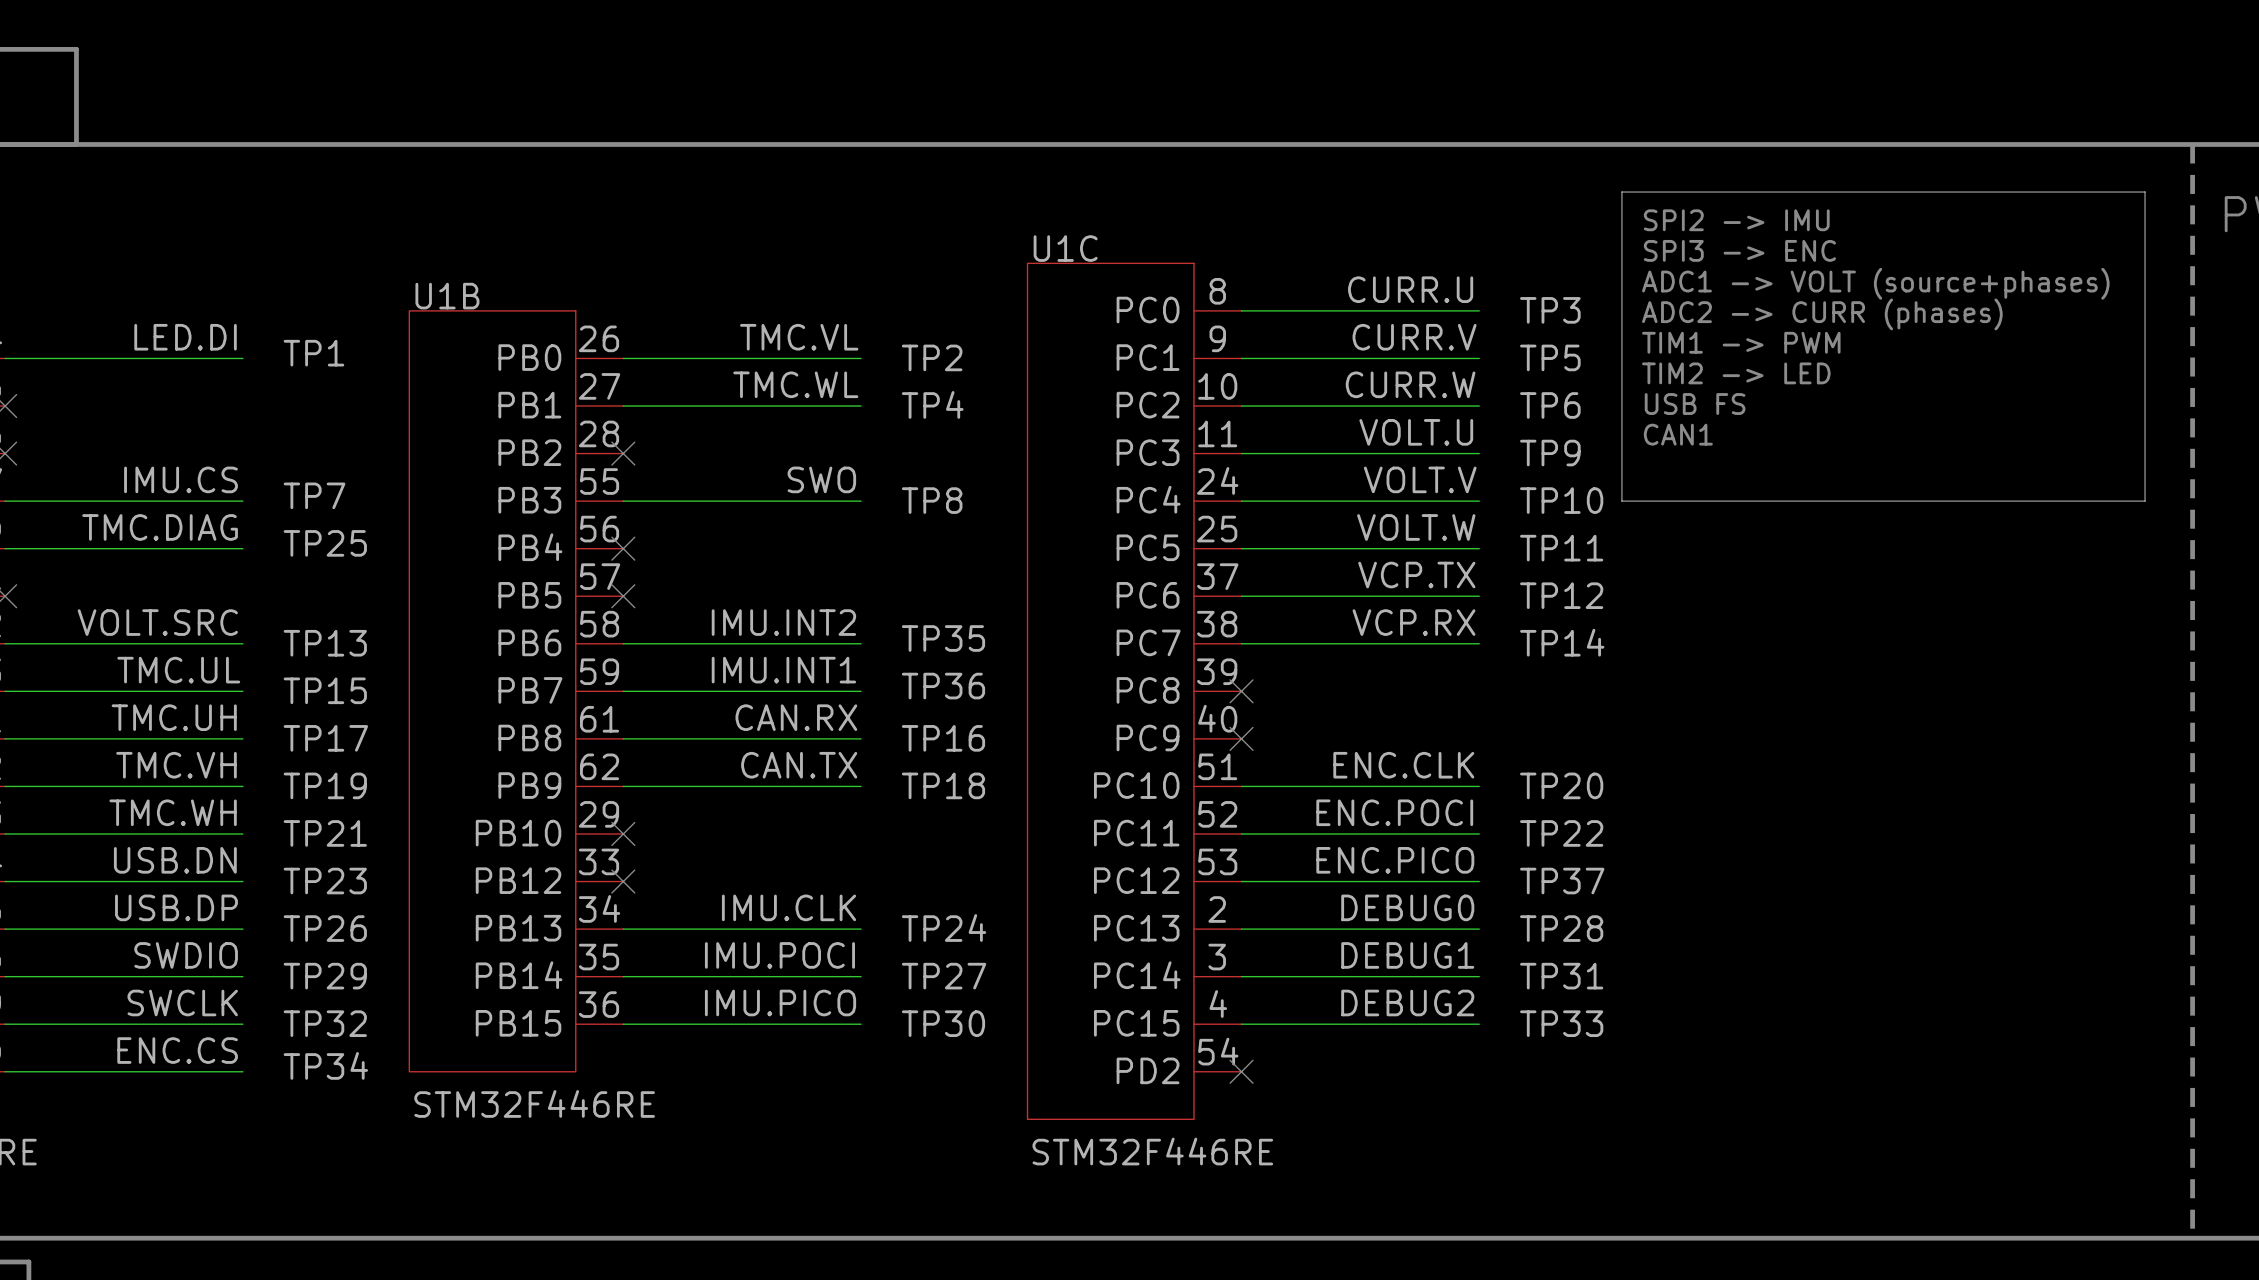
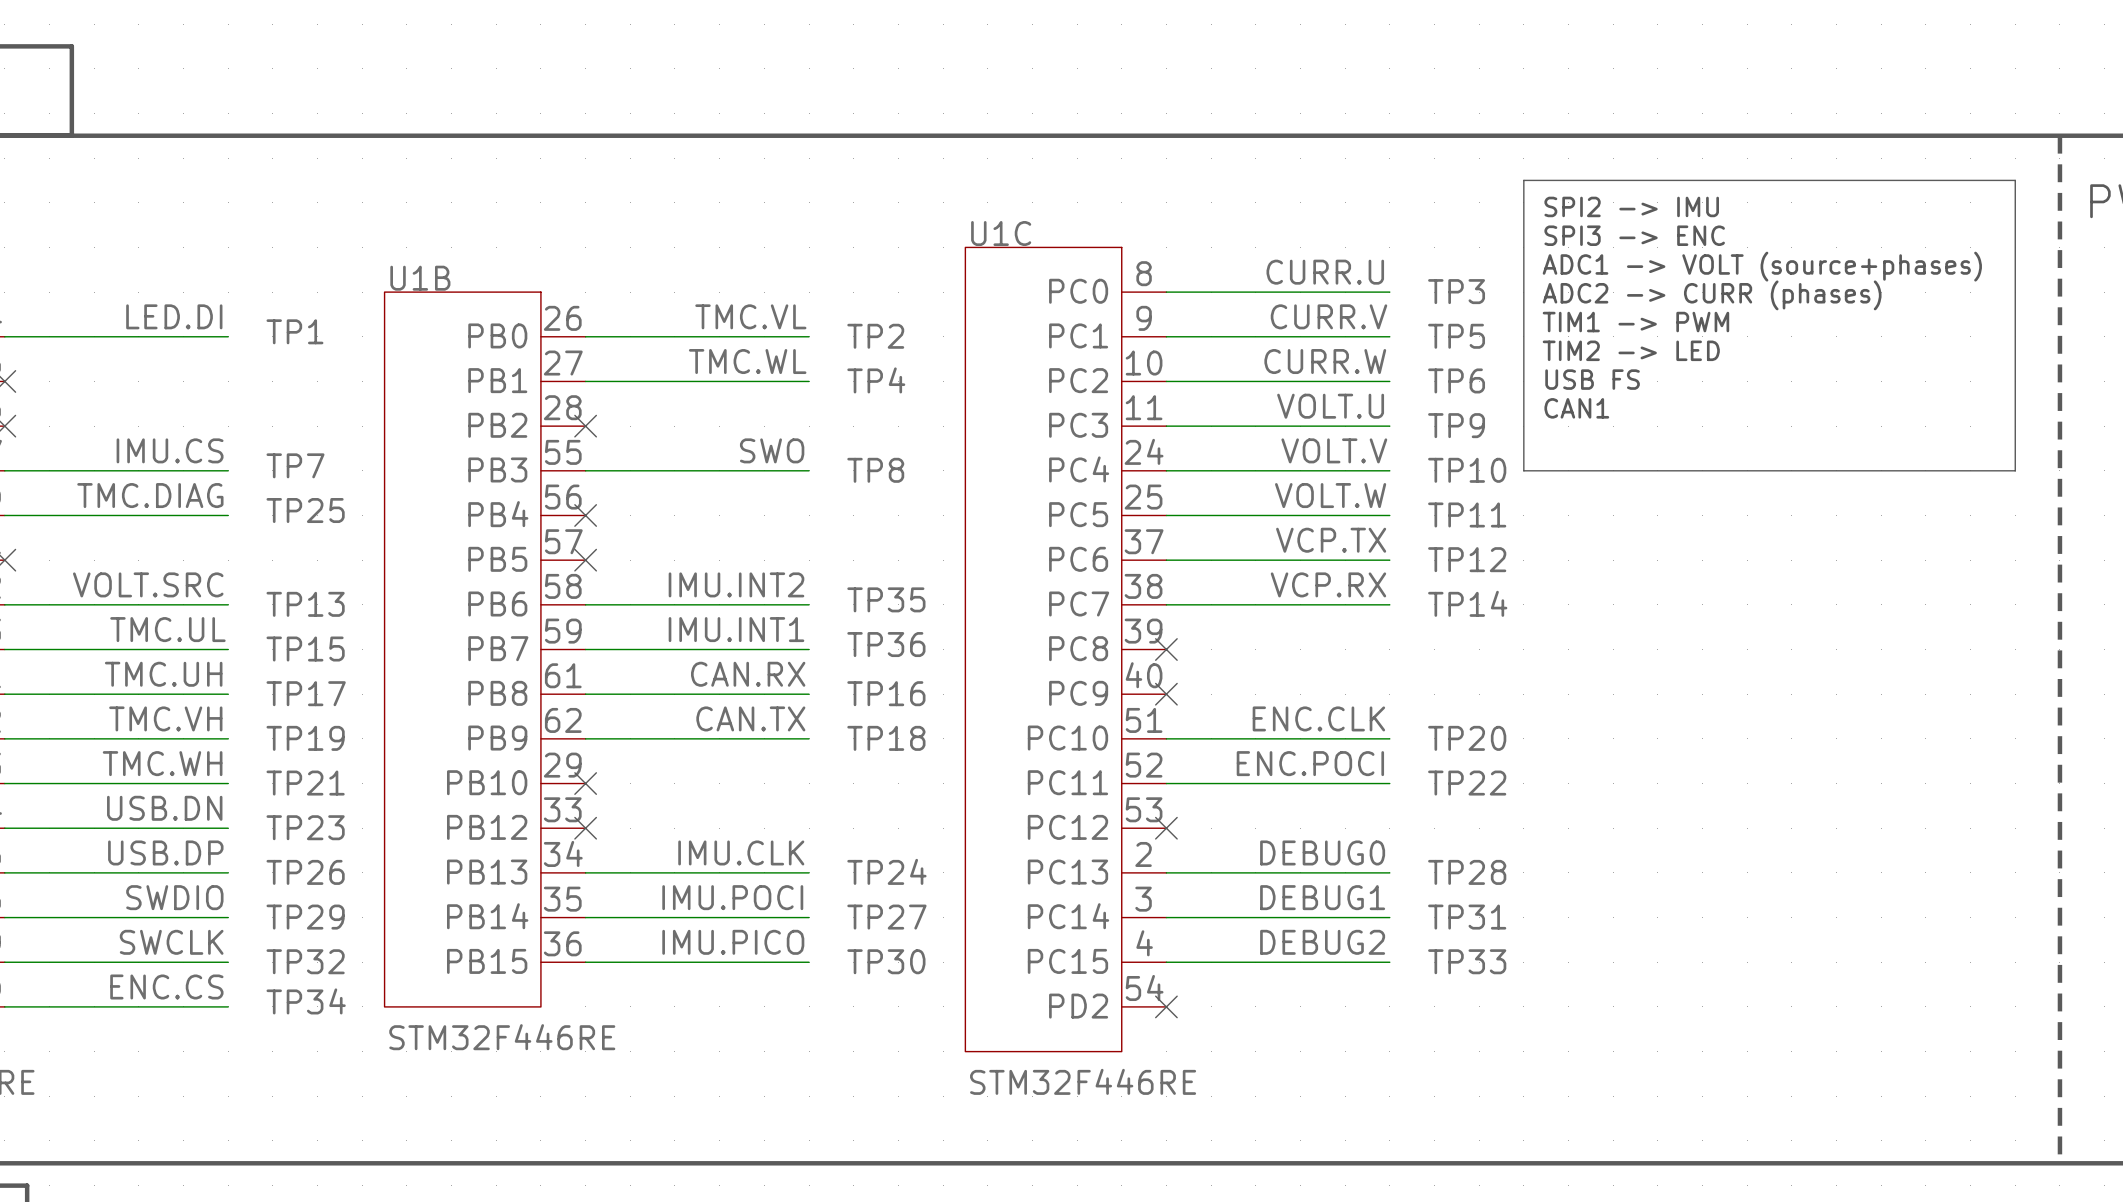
label: ENC.PICO (1395, 860) -> none
wire: (1241, 881) (1479, 881) -> none
no-connect mark: none -> (1166, 828)
TP37: (1562, 881) -> none

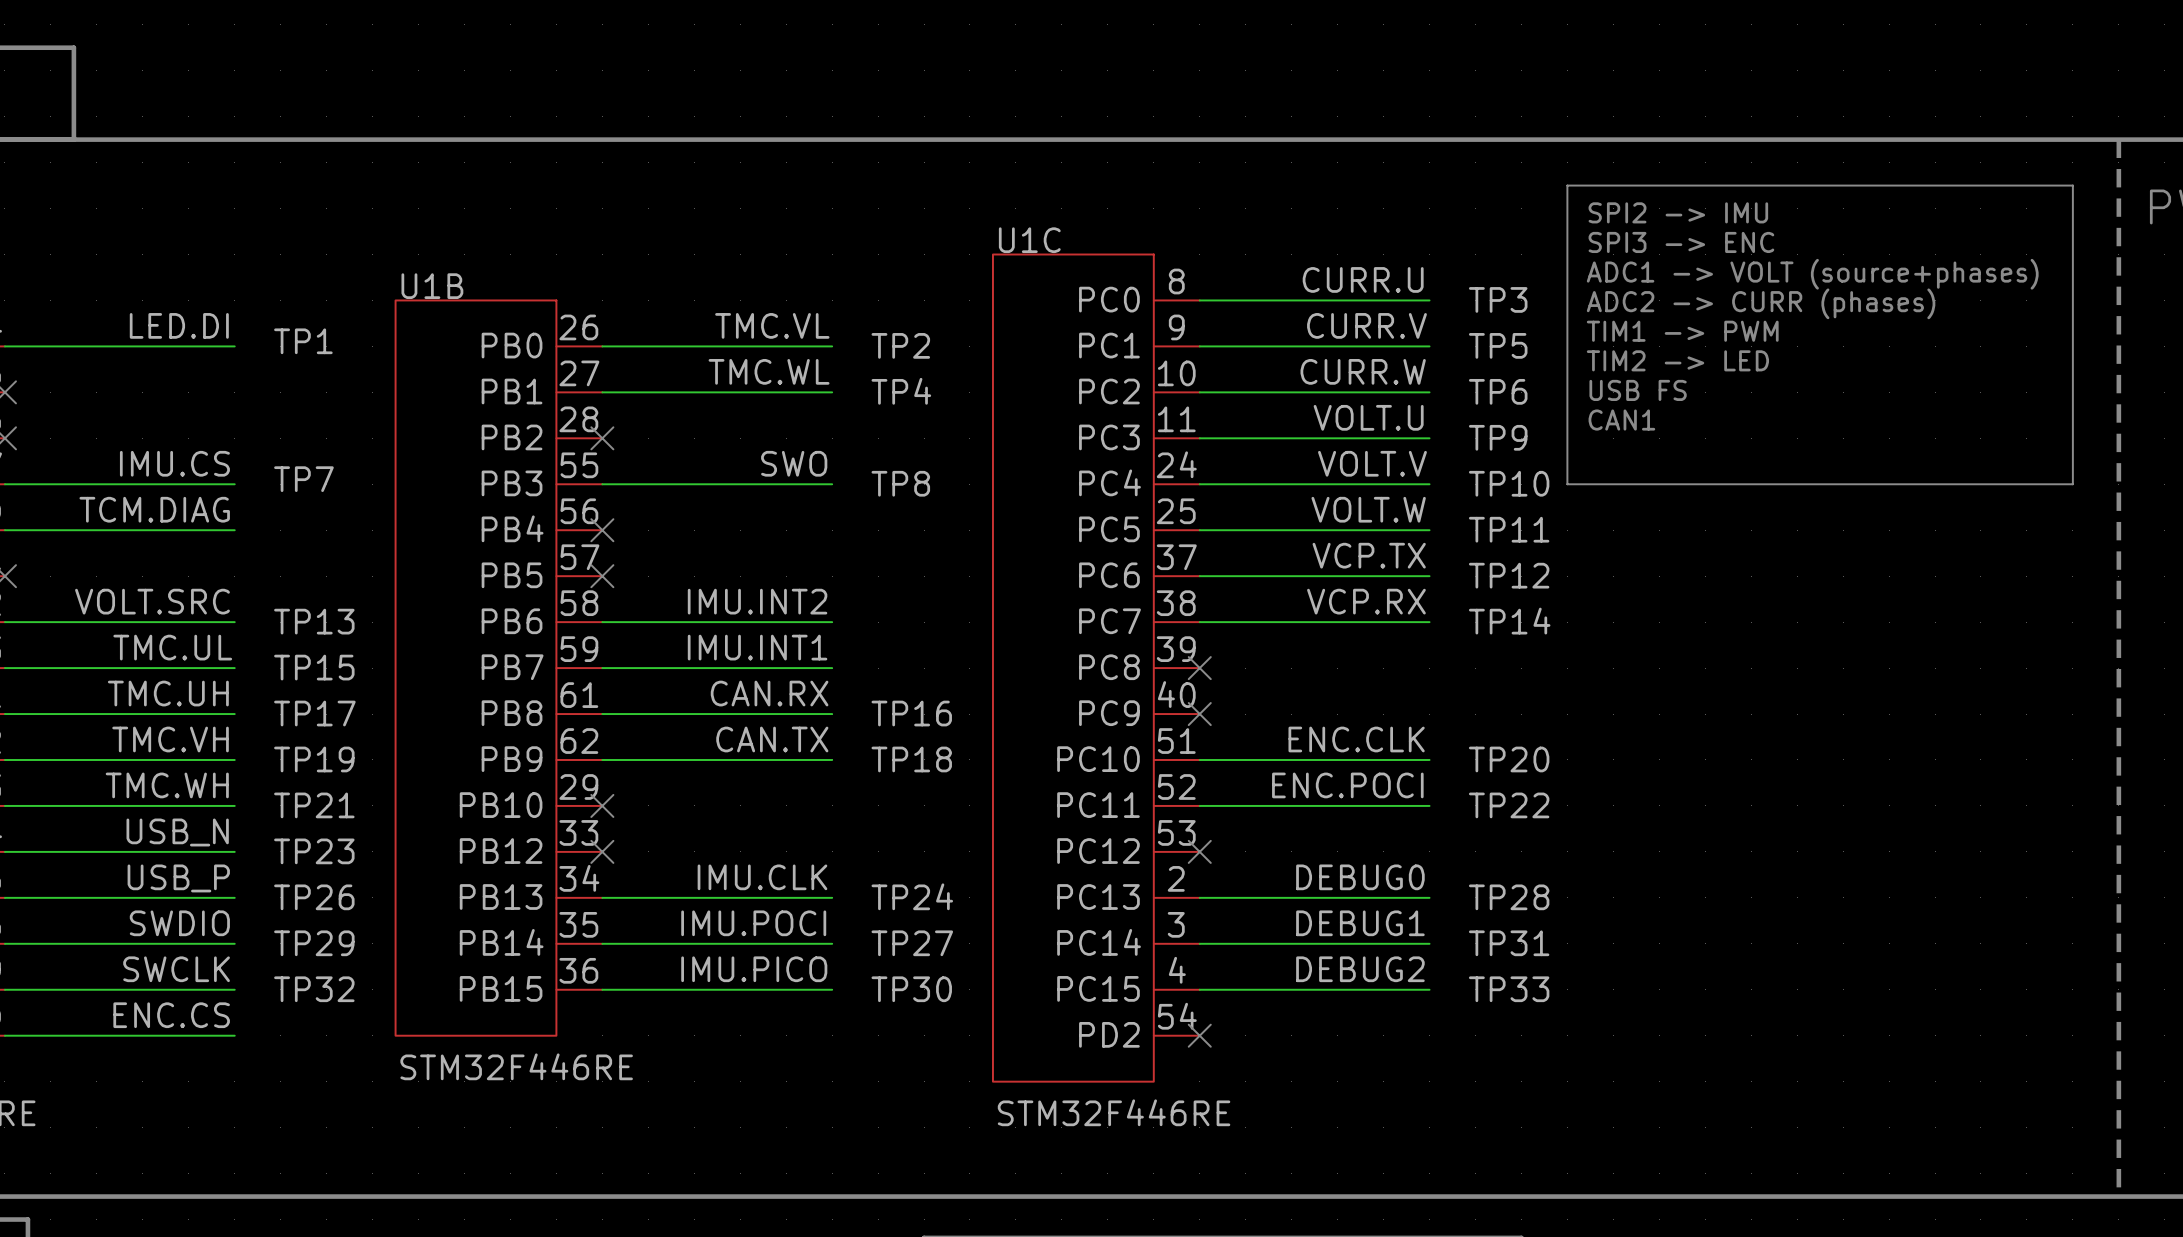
label: TMC.DIAG (150, 495) -> TCM.DIAG (154, 509)
TP25: (305, 510) -> none
TP35: (886, 599) -> none
TP36: (886, 644) -> none
label: USB.DN (164, 808) -> USB_N (177, 832)
label: USB.DP (165, 852) -> USB_P (178, 878)
TP34: (306, 1001) -> none

